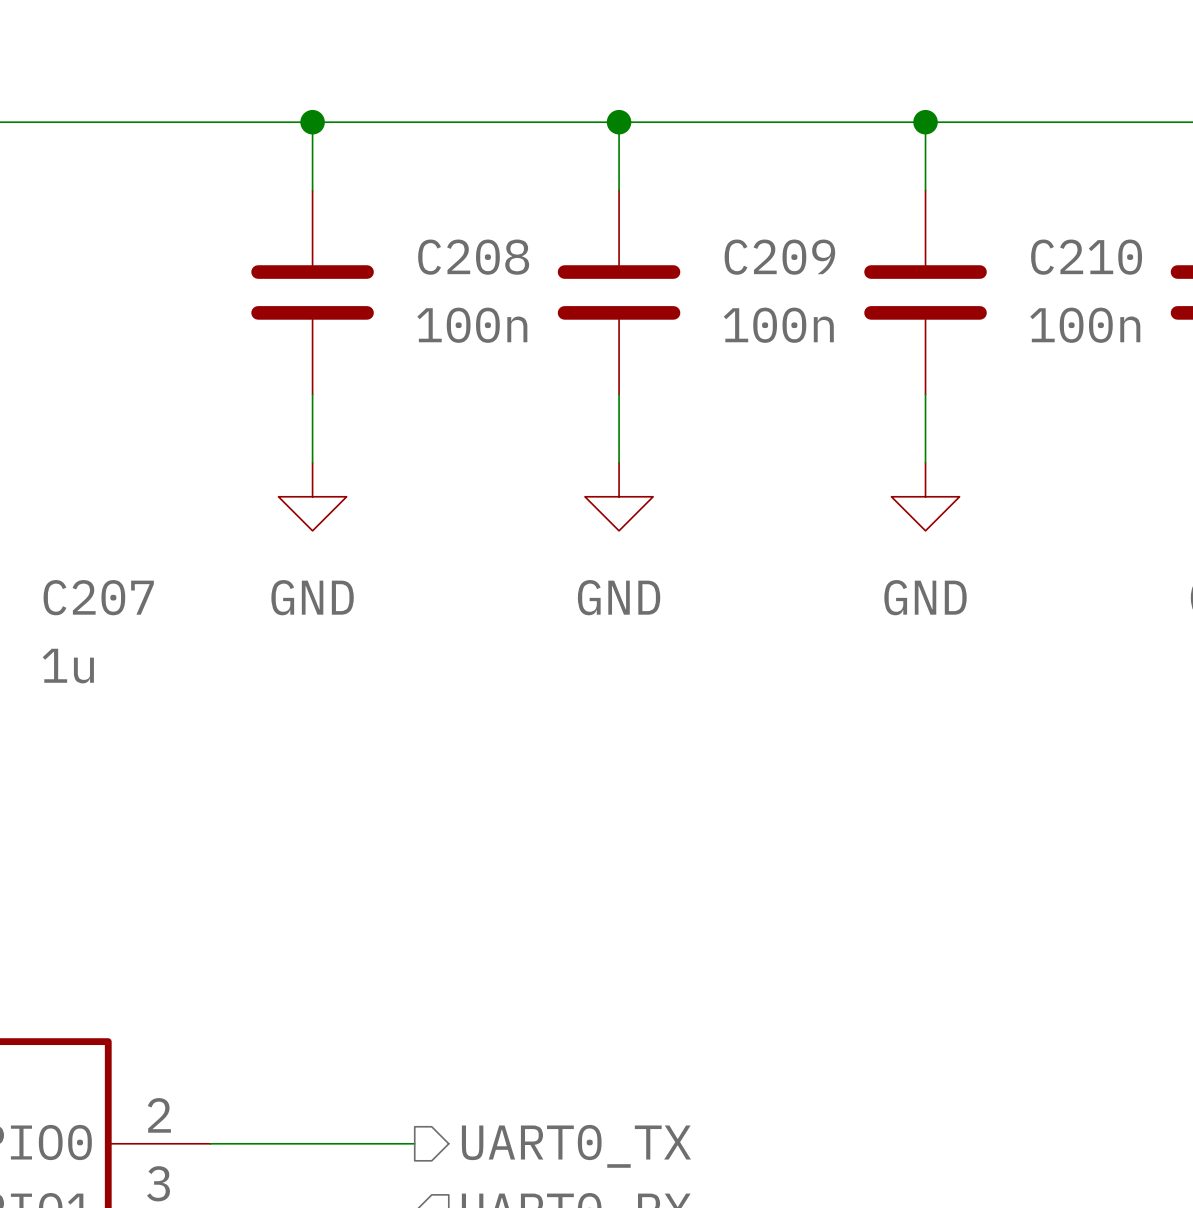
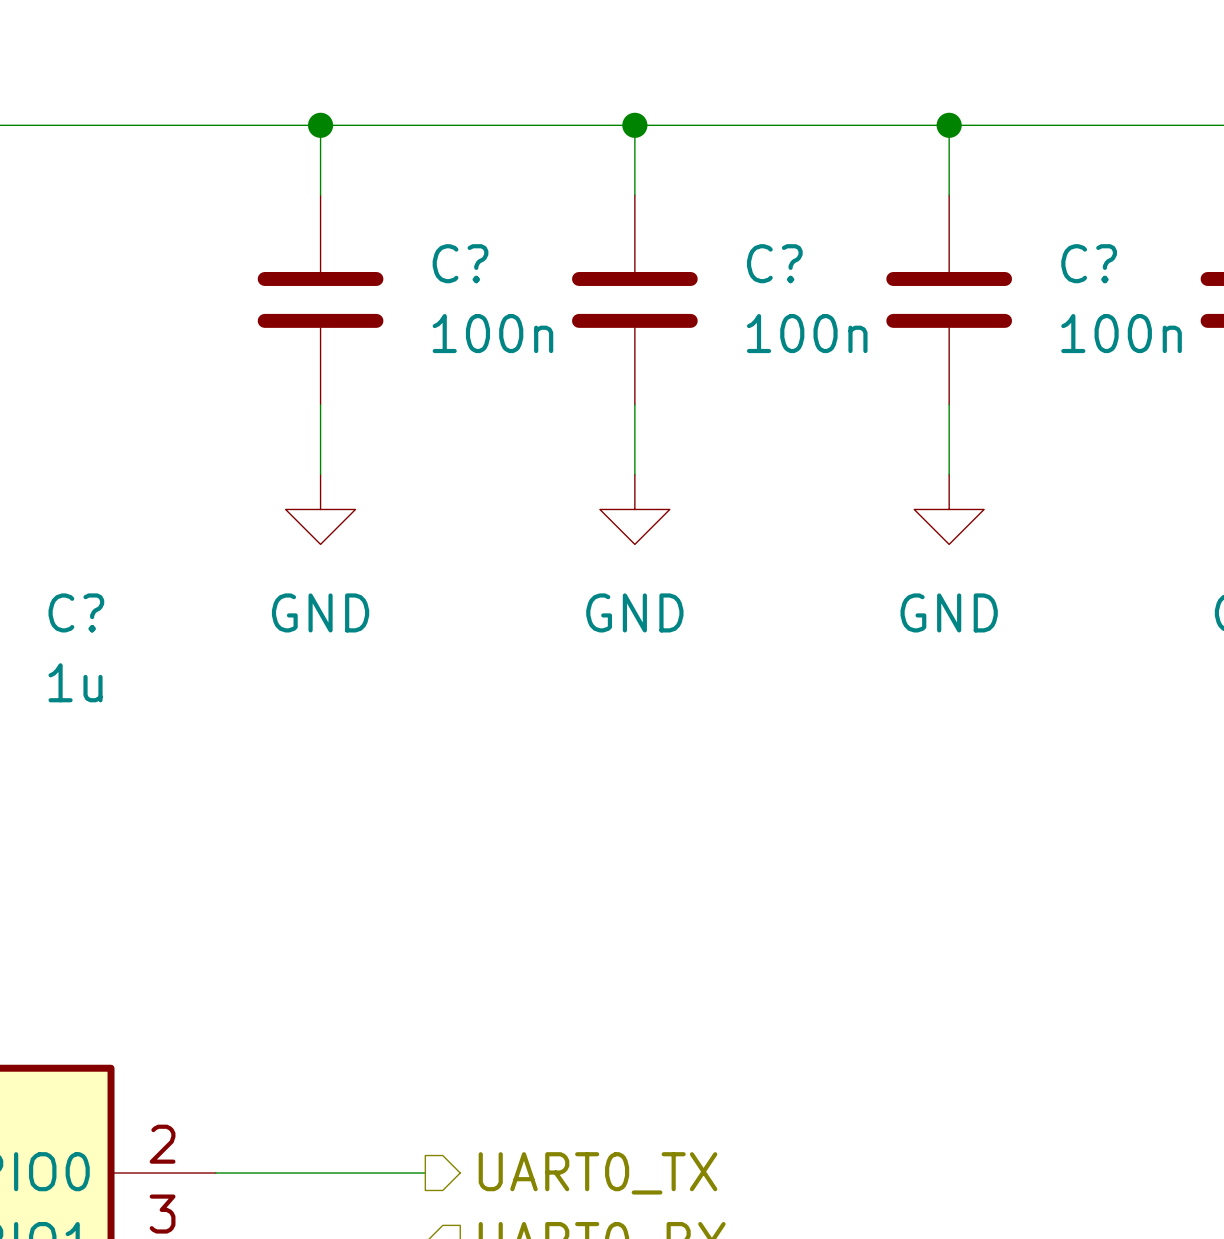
C208 name: C208 (473, 257) -> C? (460, 263)
C209 name: C209 (779, 257) -> C? (774, 263)
C210 name: C210 (1086, 257) -> C? (1089, 263)
C207 name: C207 (98, 597) -> C? (76, 612)

